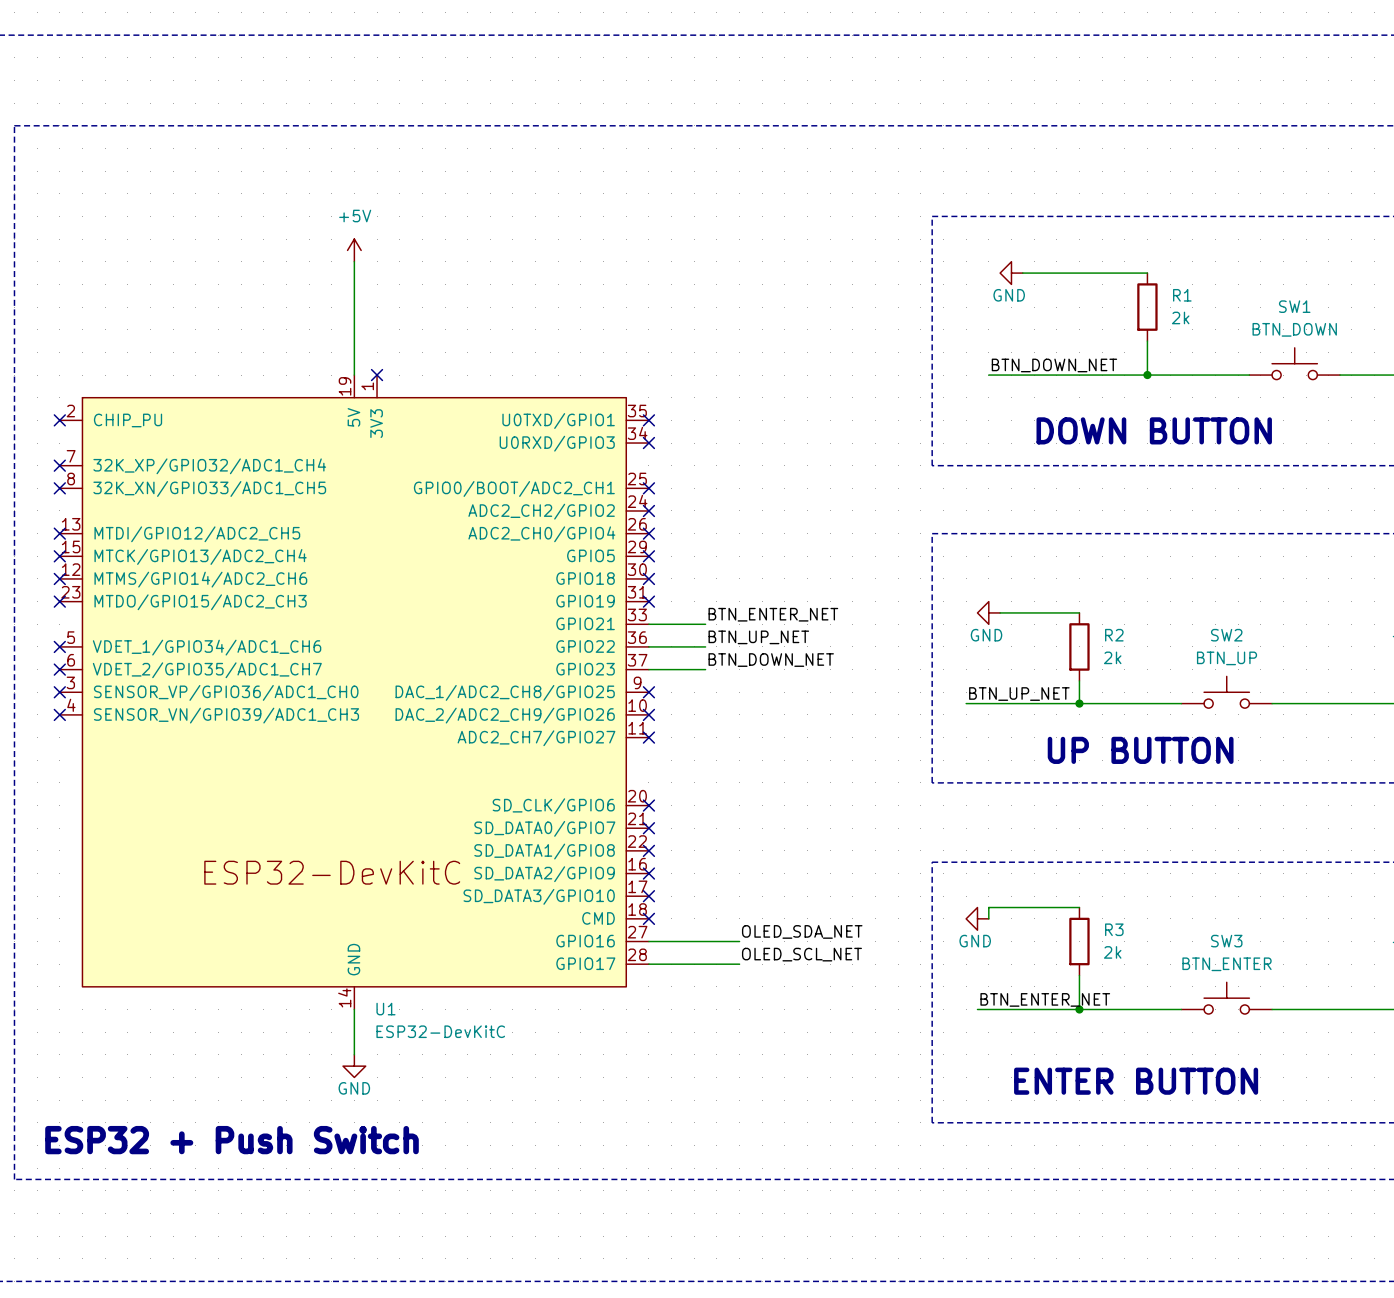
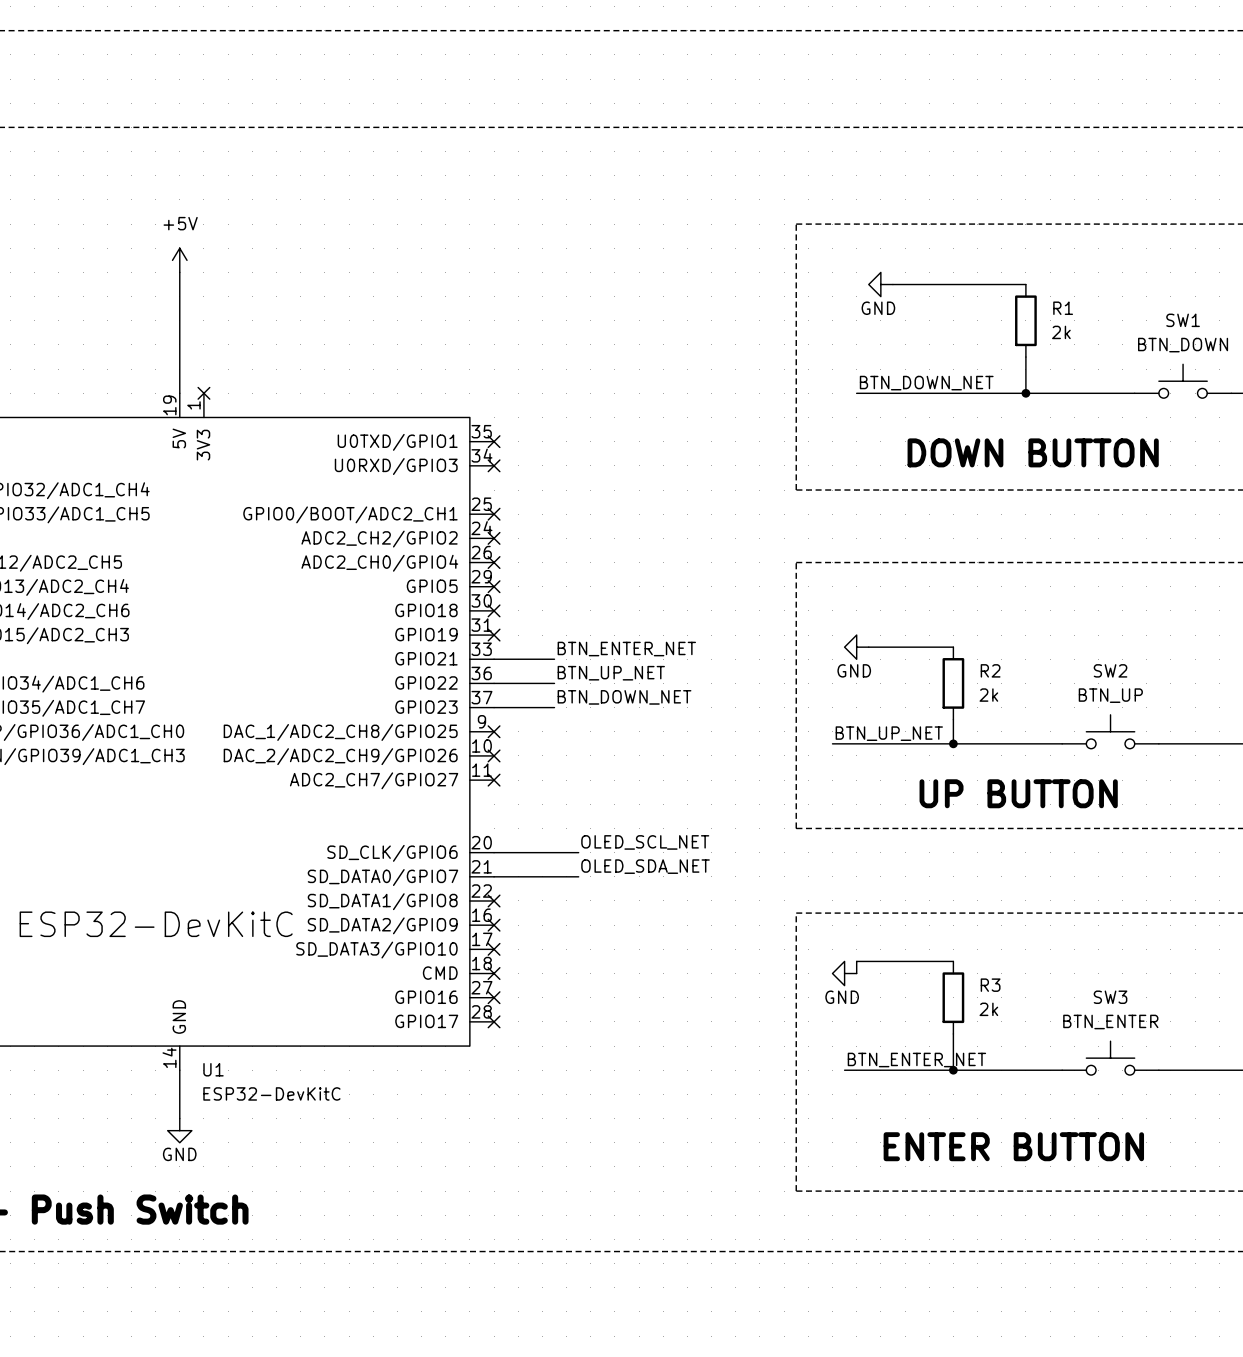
wire: none -> (494, 852) (578, 852)
no-connect mark: (648, 805) -> none
wire: none -> (494, 876) (578, 876)
no-connect mark: (648, 828) -> none
label position: OLED_SDA_NET (802, 931) -> OLED_SDA_NET (645, 866)
wire: (648, 941) (739, 941) -> none
no-connect mark: none -> (494, 997)
label position: OLED_SCL_NET (801, 954) -> OLED_SCL_NET (645, 842)
wire: (648, 964) (739, 964) -> none
no-connect mark: none -> (494, 1021)

